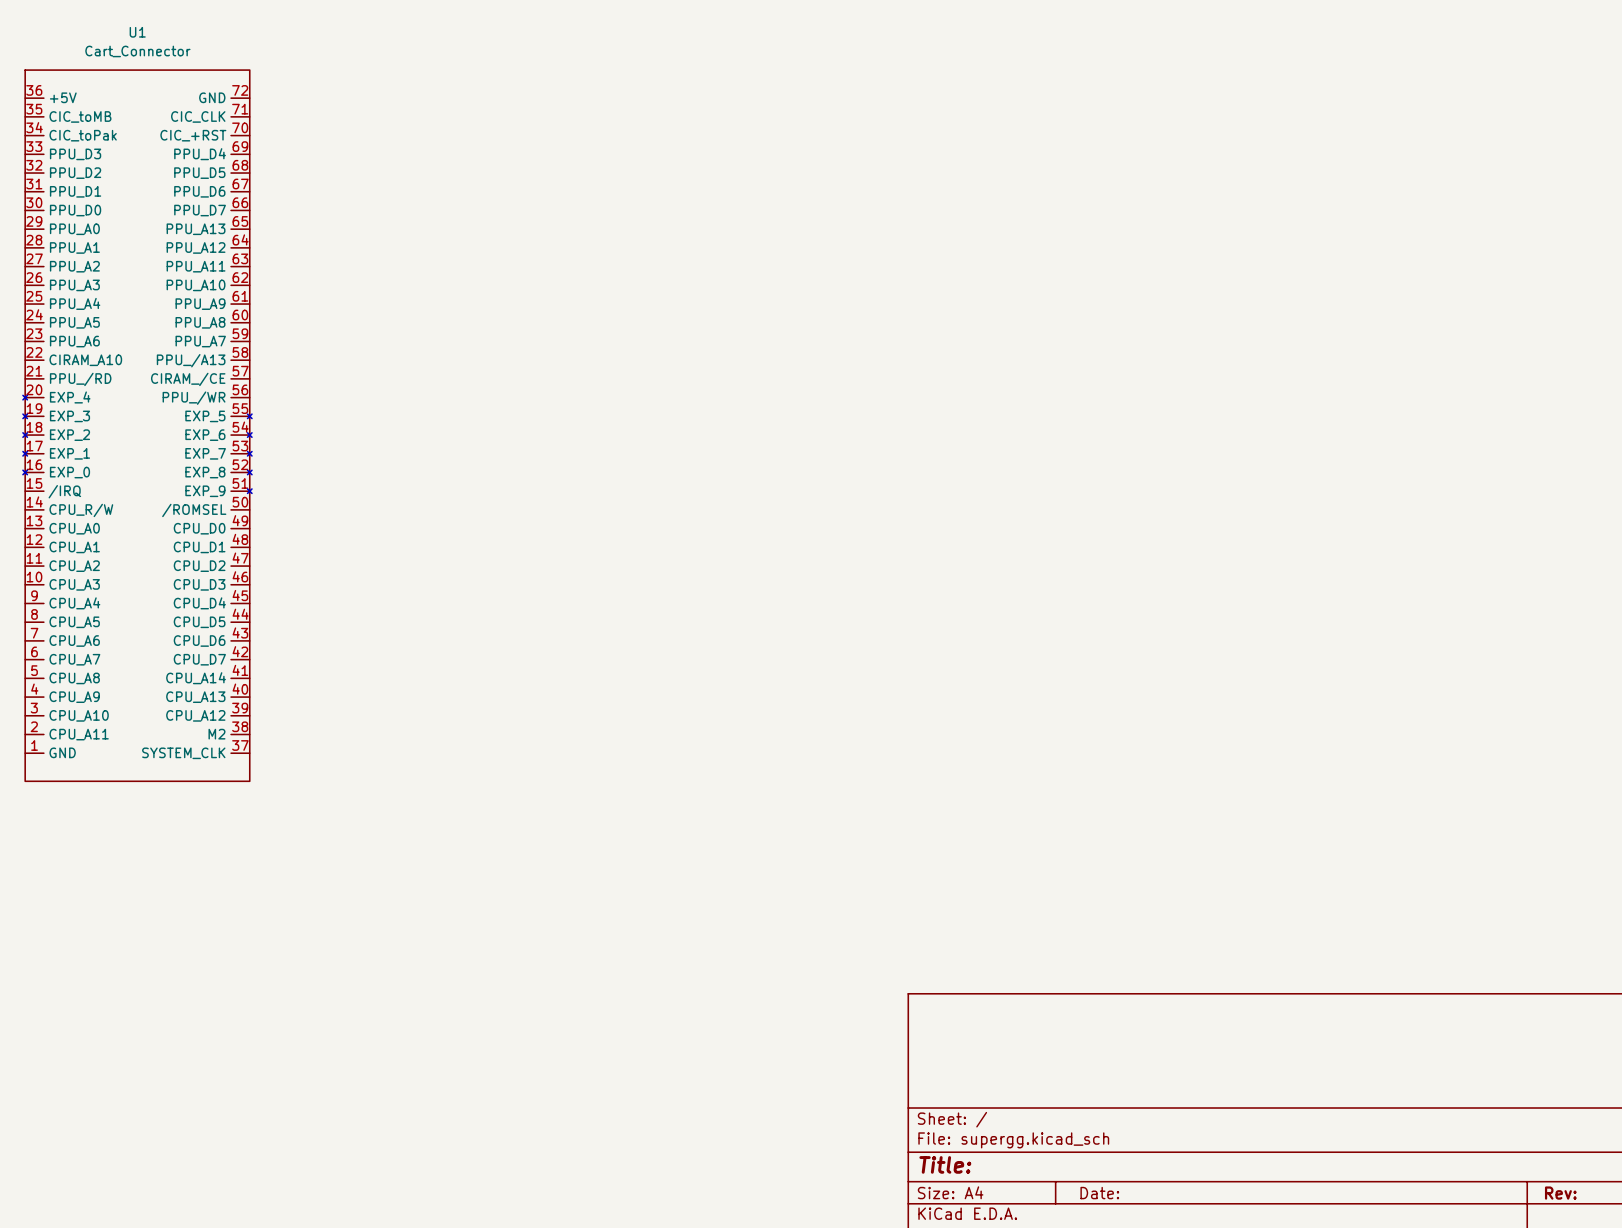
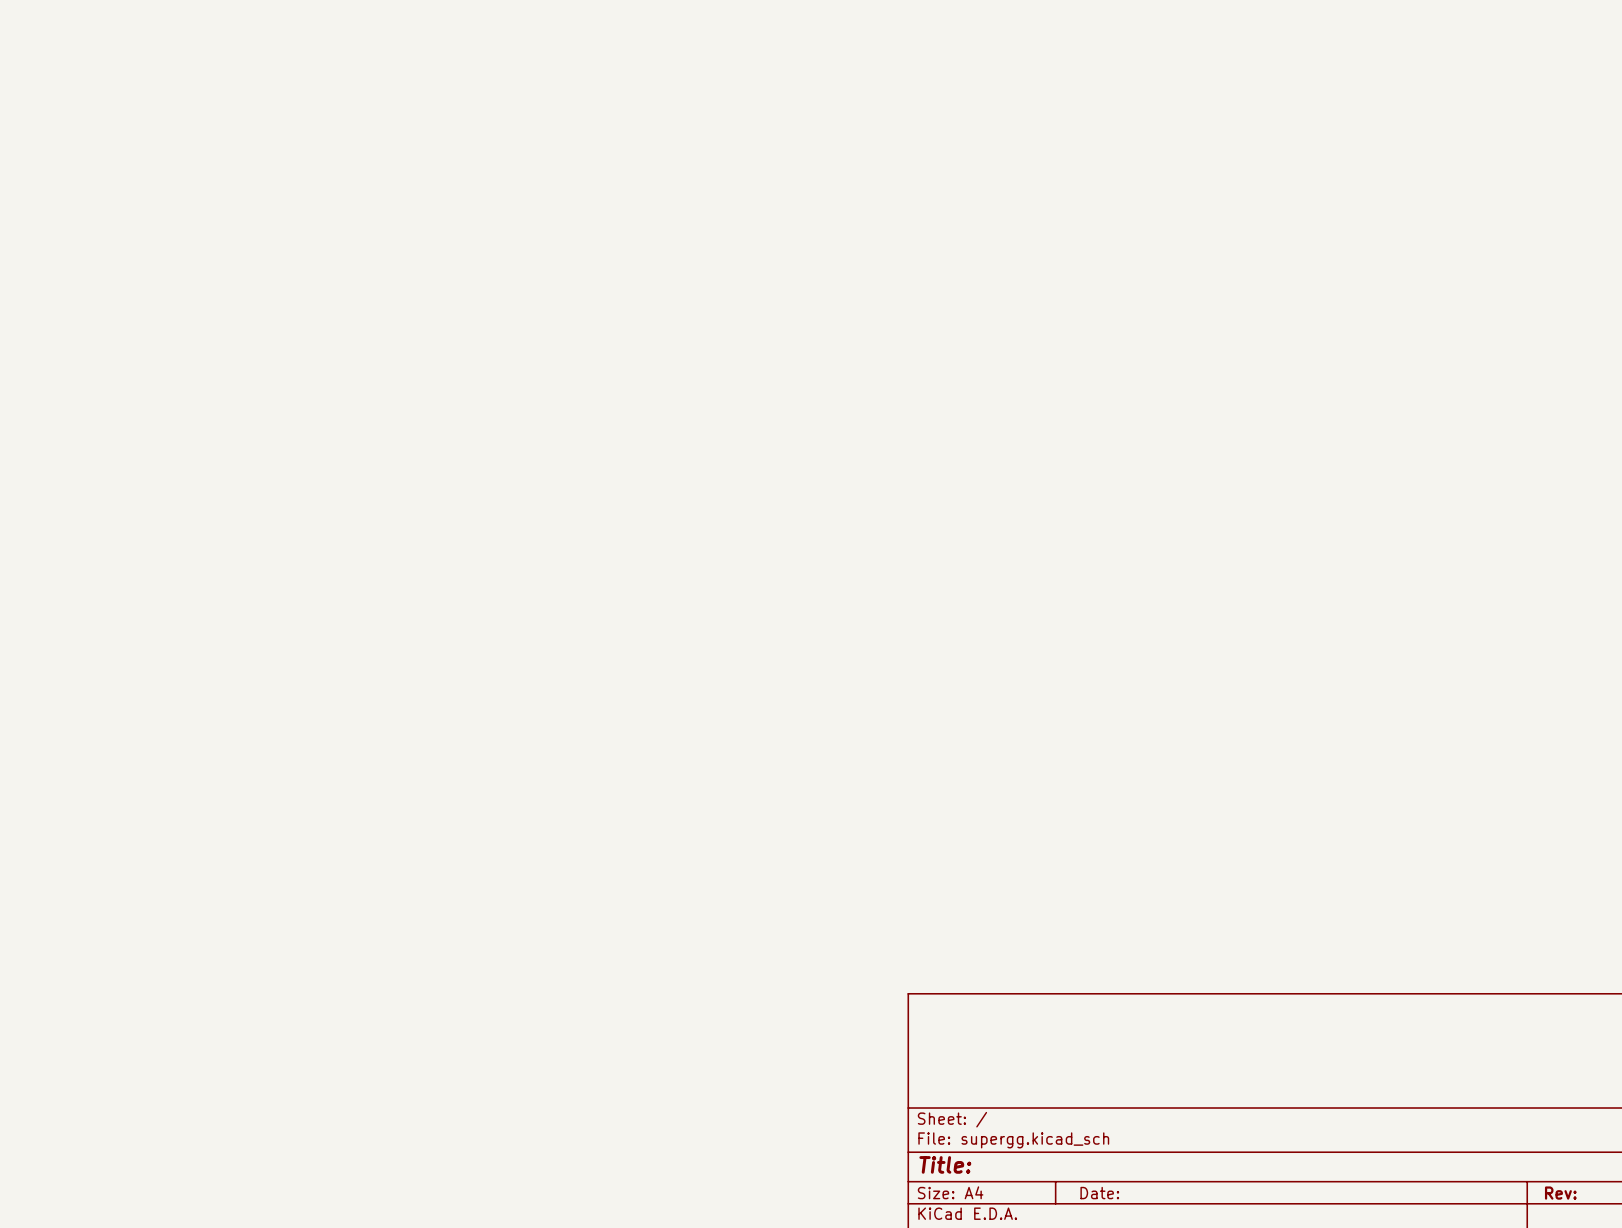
U1: Cart_Connector (137, 425) -> none

